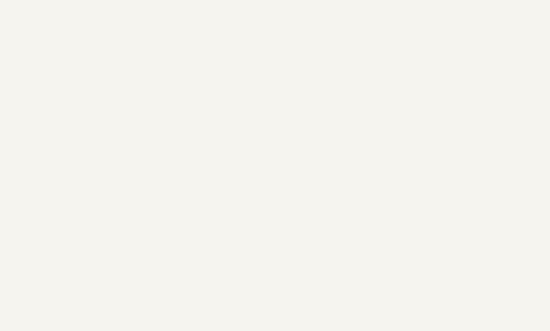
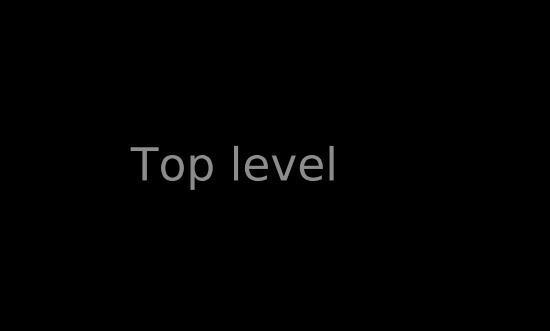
text: none -> Top level (232, 167)

